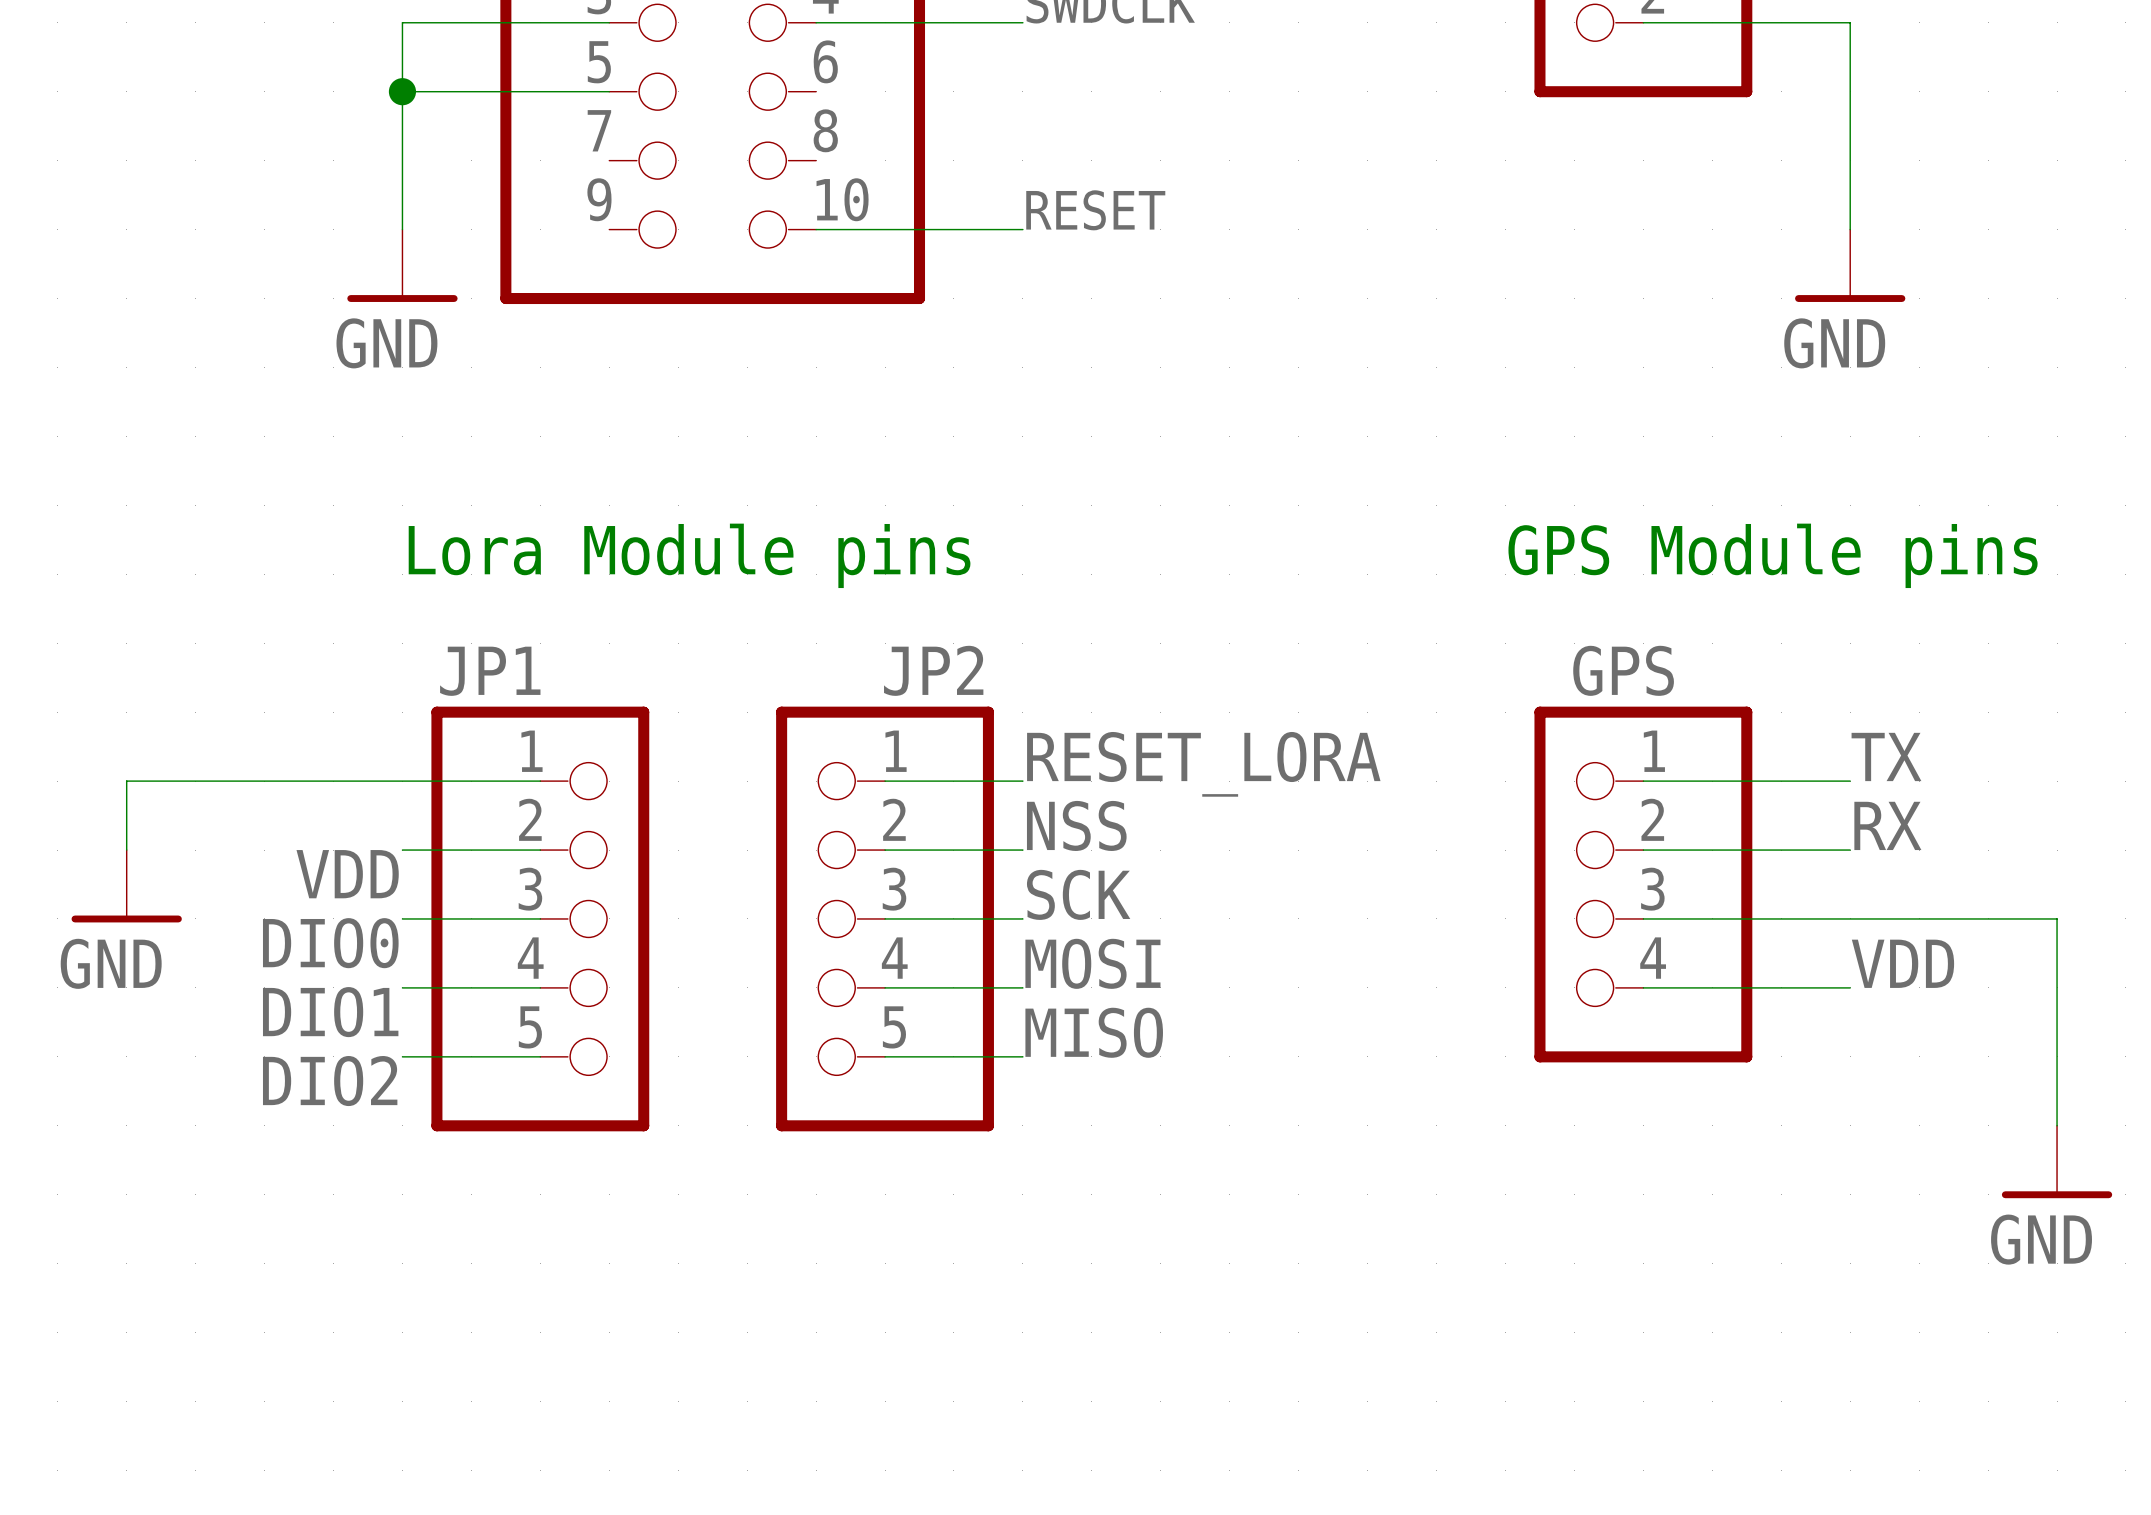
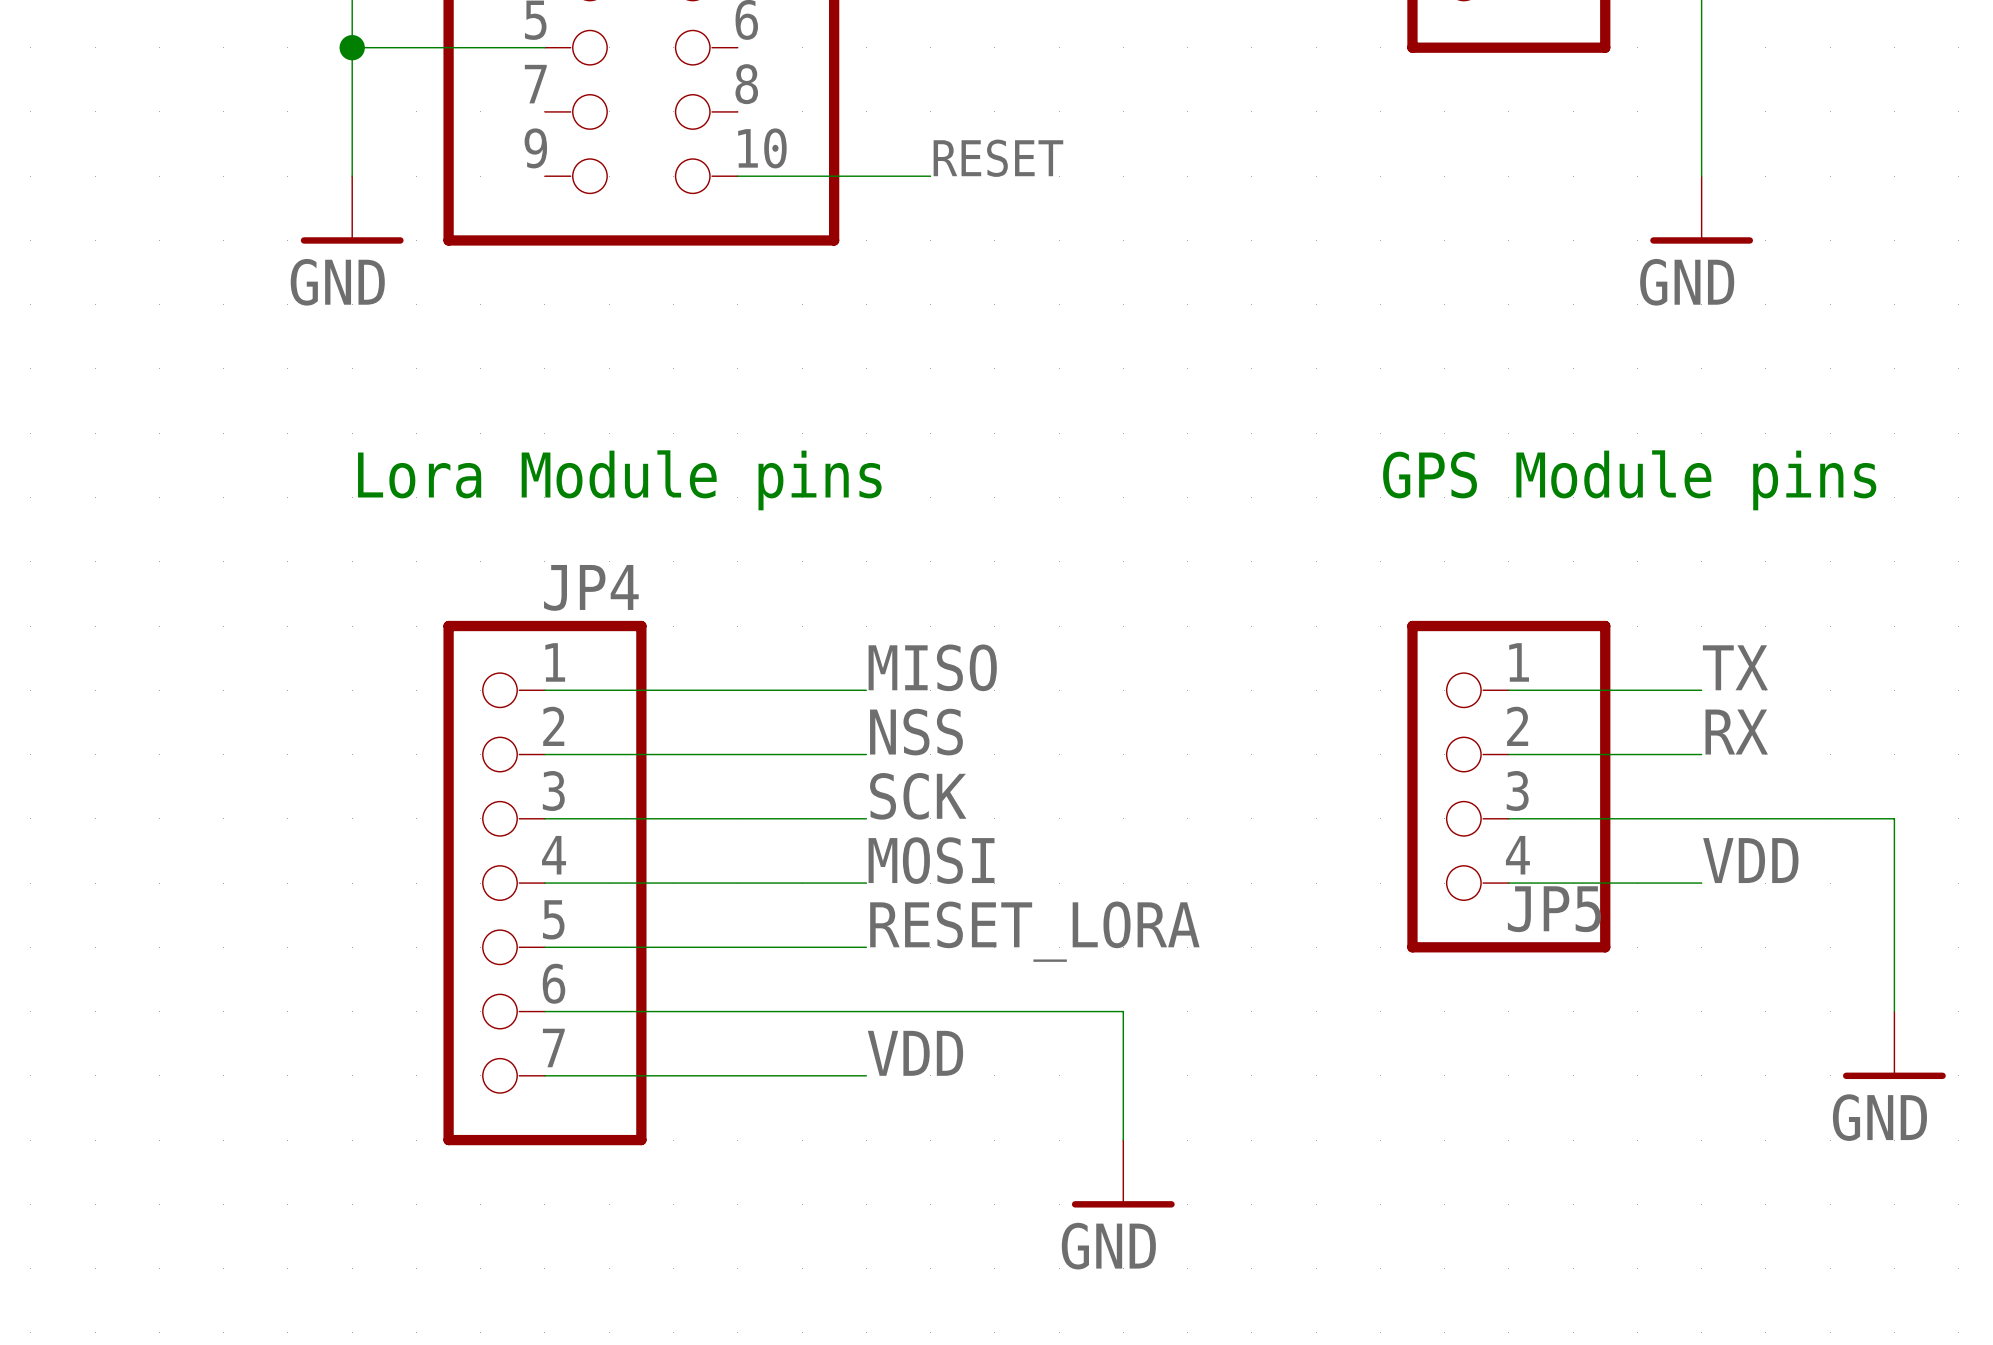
GPS name: GPS (1623, 670) -> JP5 (1554, 909)
label position: RESET_LORA (1203, 764) -> RESET_LORA (1034, 931)
wire: (540, 781) (126, 781) (126, 850) -> none
wire: none -> (544, 690) (802, 690)
wire: (953, 781) (1022, 781) -> none
label position: NSS (1076, 825) -> NSS (916, 732)
wire: (402, 850) (540, 850) -> none
wire: none -> (544, 754) (802, 754)
wire: (953, 850) (1022, 850) -> none
label position: VDD (347, 874) -> VDD (915, 1053)
power symbol: GND (126, 886) -> none
label position: SCK (1078, 894) -> SCK (918, 796)
wire: (402, 918) (540, 918) -> none
JP1: (540, 918) -> none
wire: none -> (544, 818) (802, 818)
JP2: (885, 918) -> none
wire: (953, 918) (1022, 918) -> none
label: DIO0 (330, 943) -> none
label position: MOSI (1092, 963) -> MOSI (931, 860)
wire: (402, 987) (540, 987) -> none
wire: none -> (544, 883) (802, 883)
JP4: none -> (544, 883)
wire: (953, 987) (1022, 987) -> none
label: DIO1 (330, 1012) -> none
label position: MISO (1094, 1032) -> MISO (932, 667)
wire: (402, 1056) (540, 1056) -> none
wire: none -> (544, 947) (802, 947)
wire: (953, 1056) (1022, 1056) -> none
label: DIO2 (330, 1081) -> none
wire: none -> (544, 1011) (1123, 1011) (1123, 1140)
wire: none -> (544, 1075) (866, 1075)
power symbol: none -> GND (1123, 1173)

